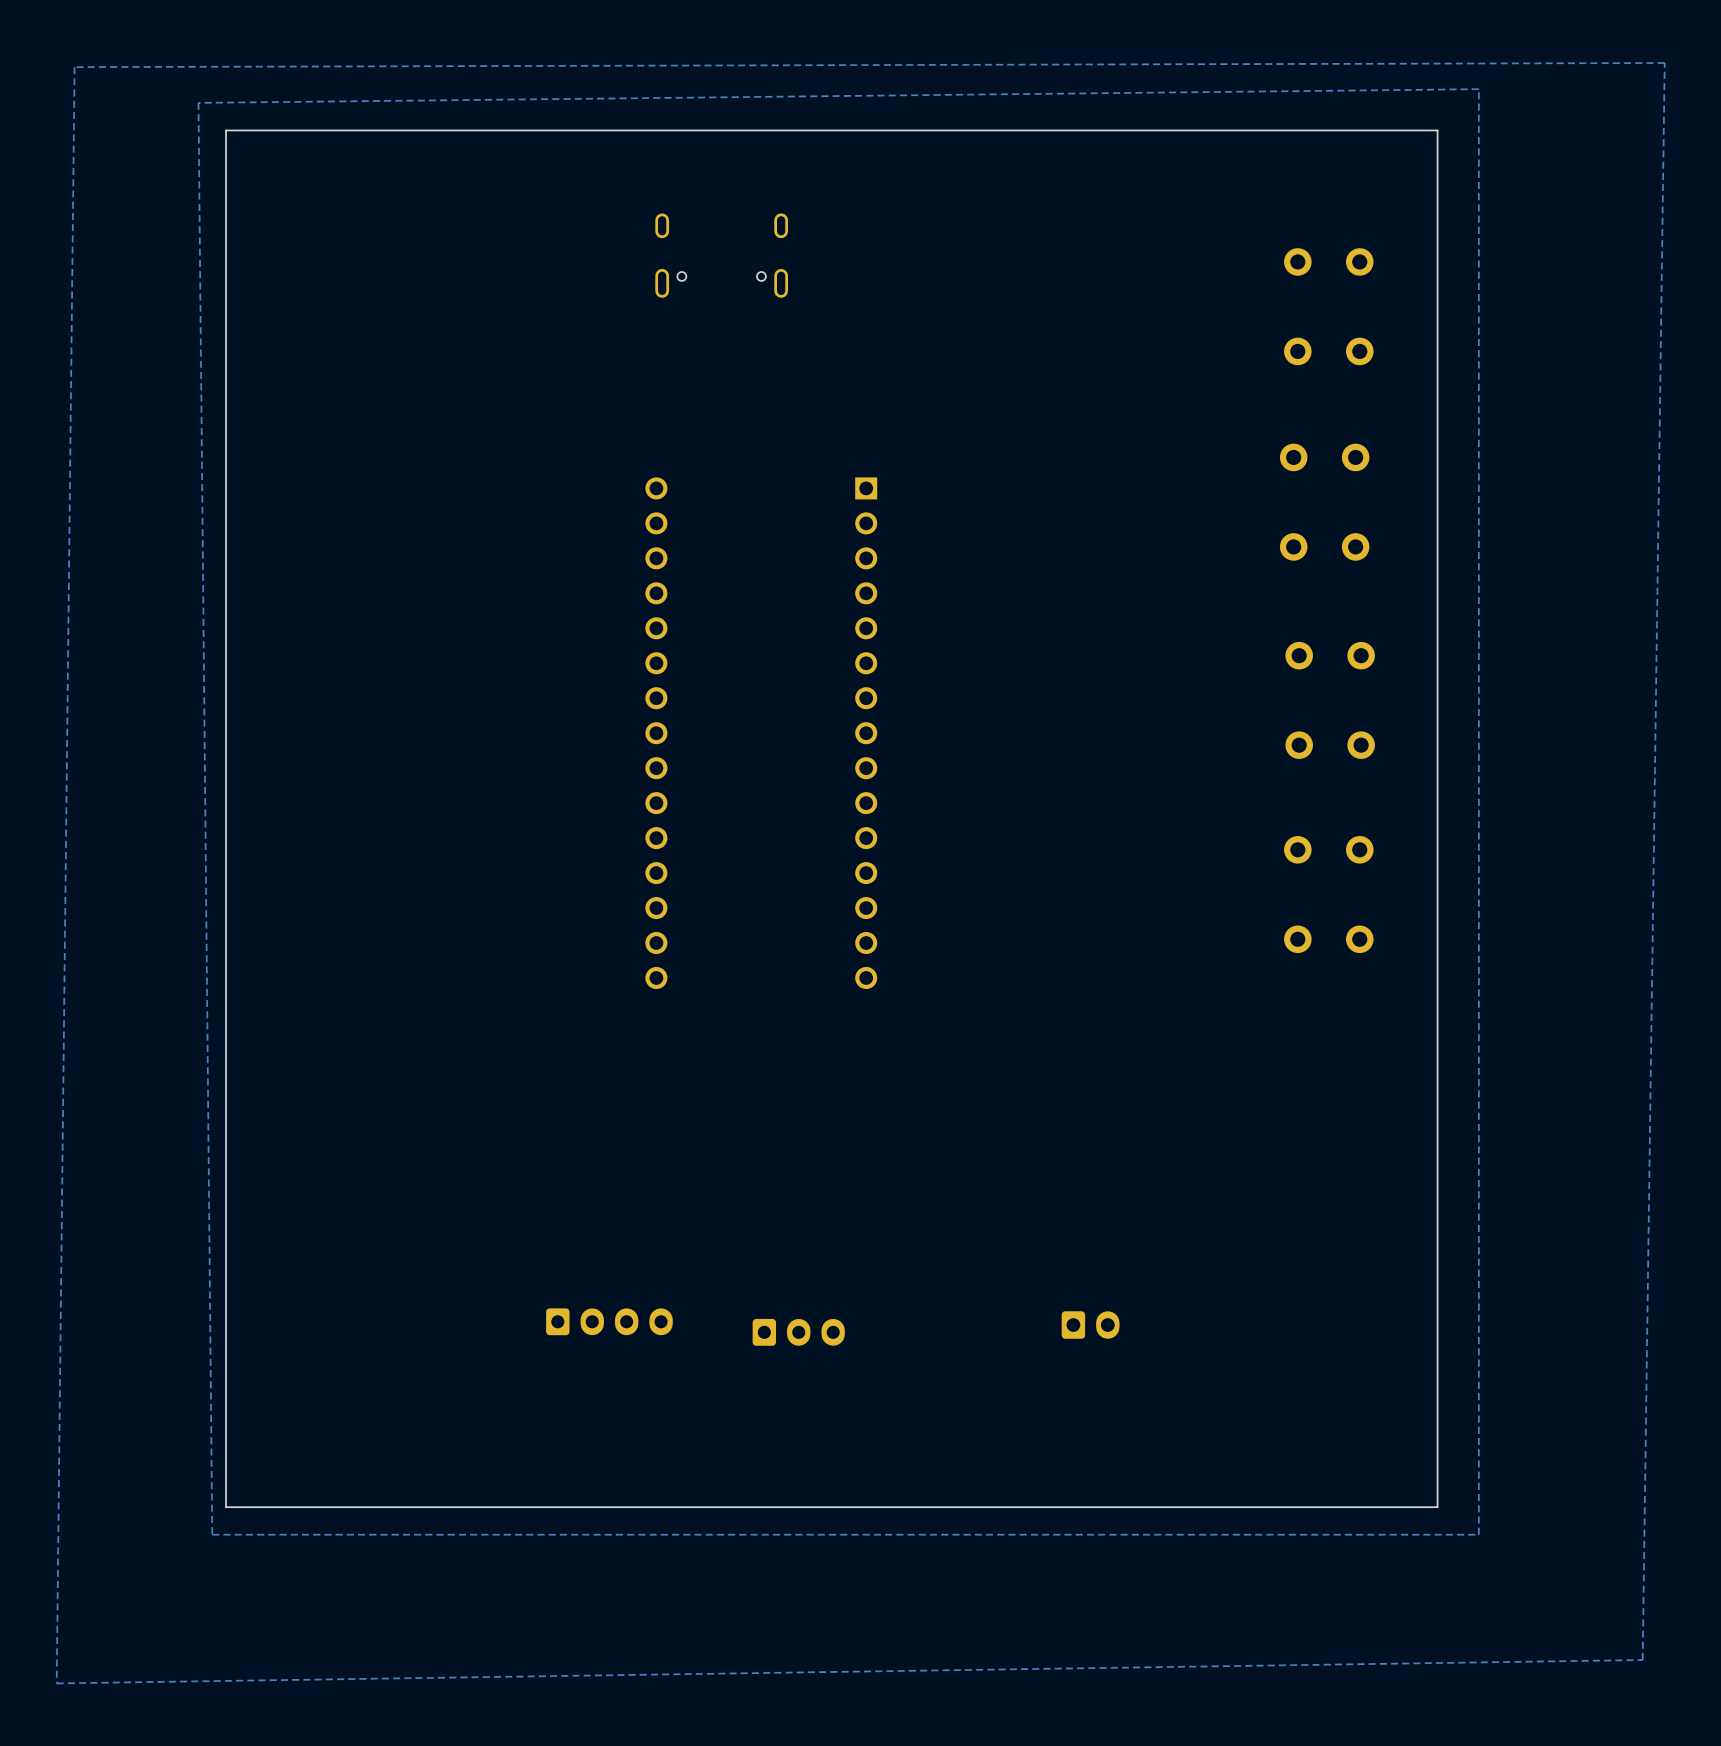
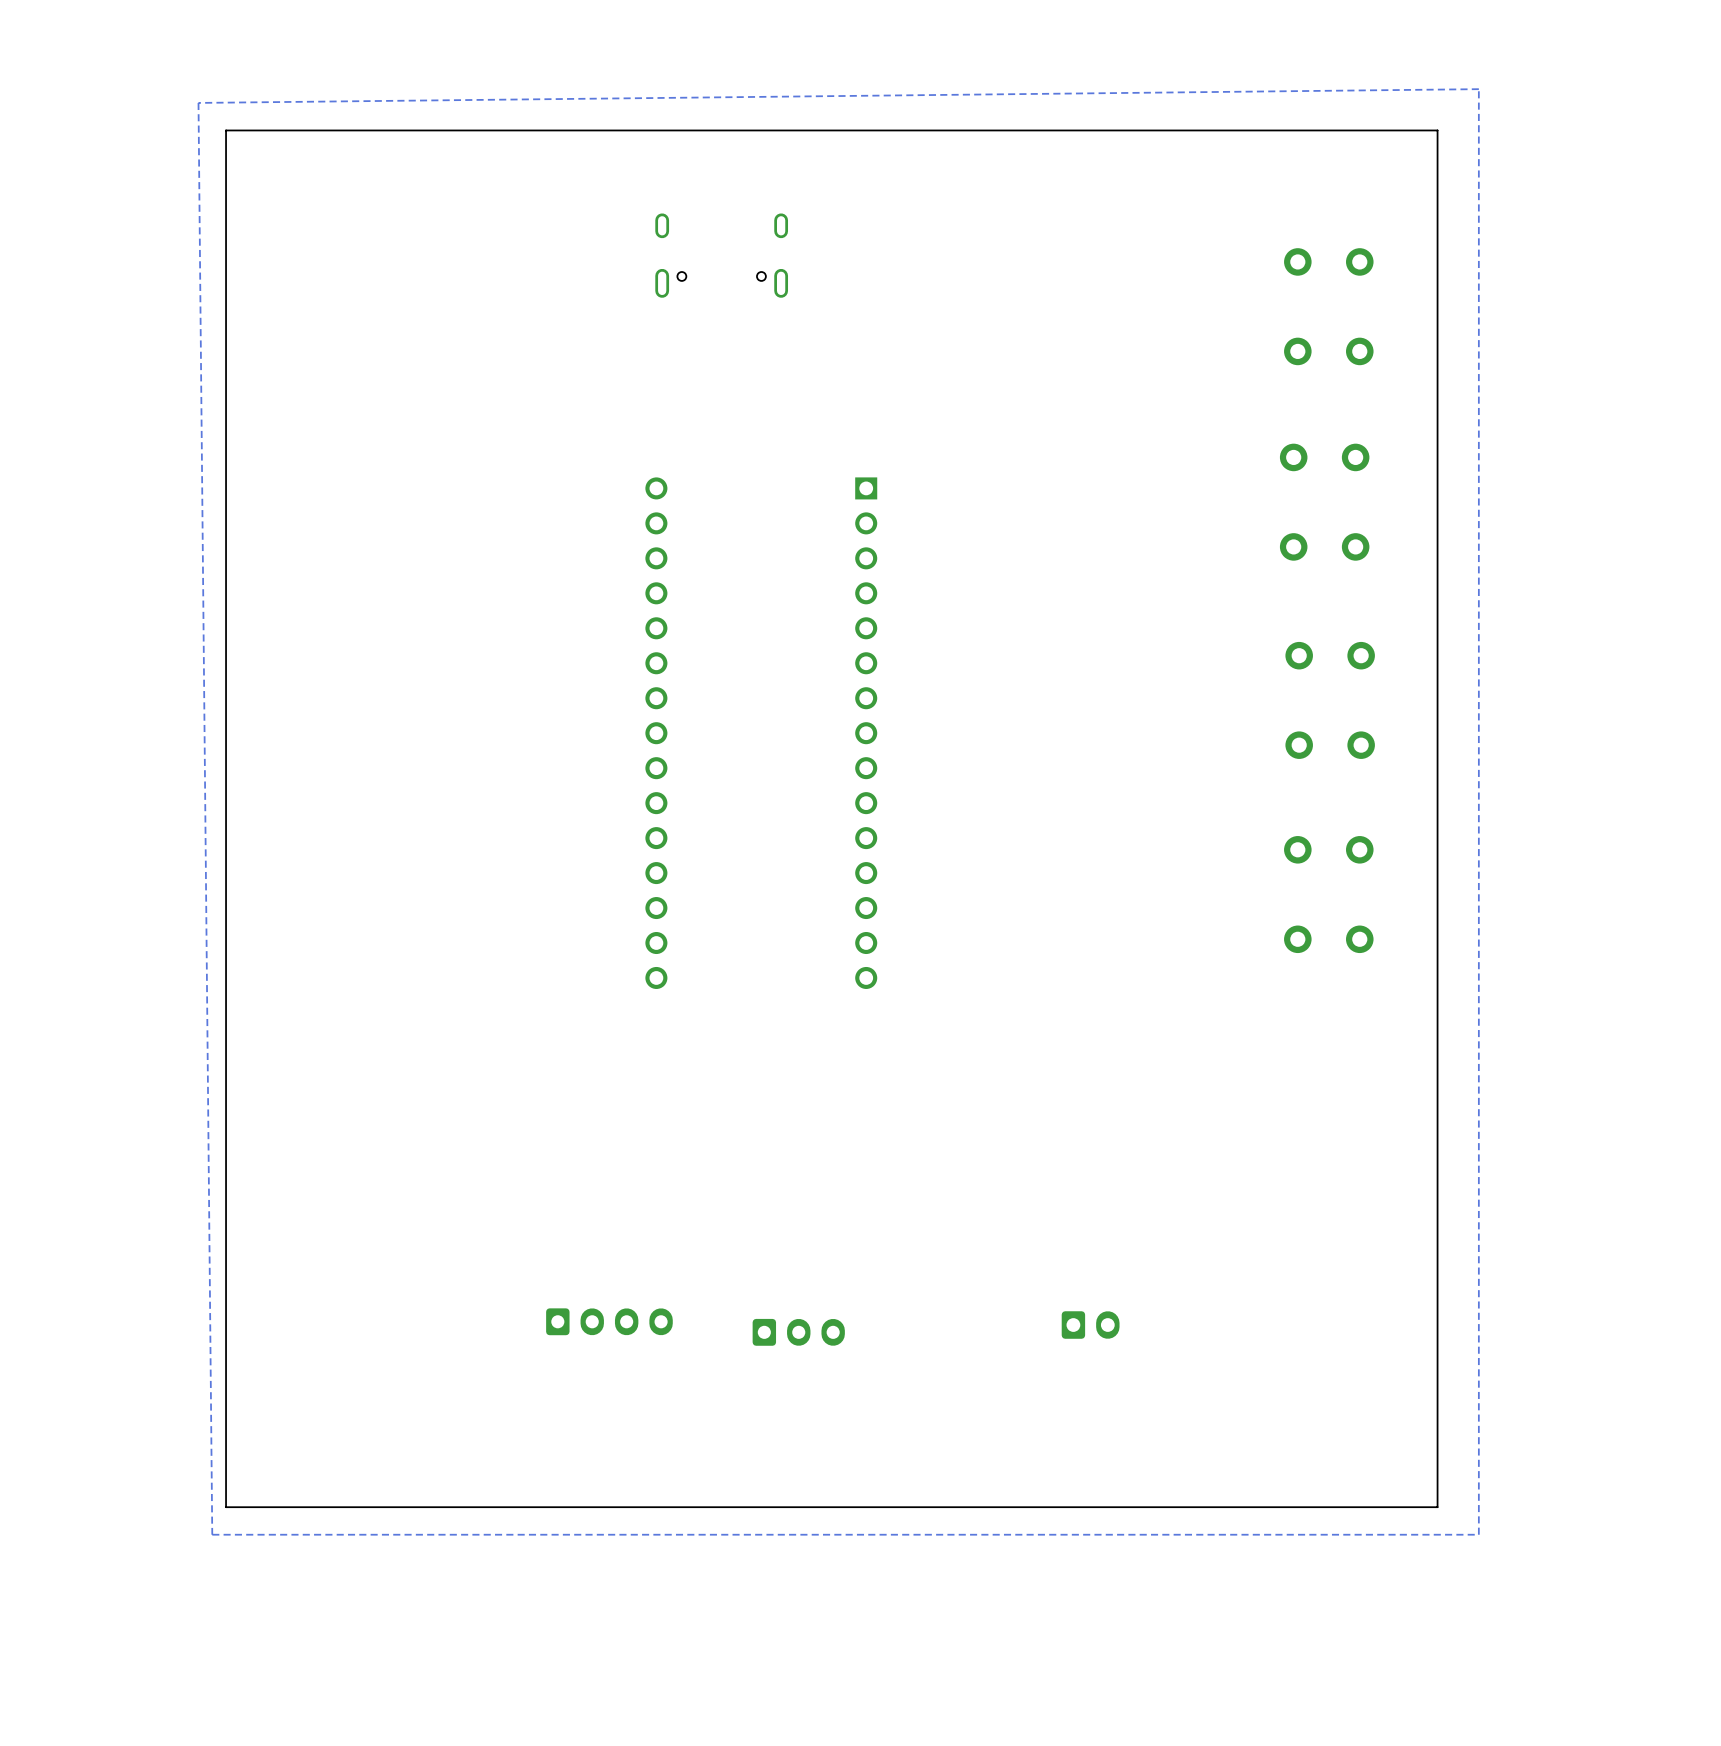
zone outline: (1664, 63) (74, 67) (56, 1683) (1642, 1660) (1664, 63) -> none

